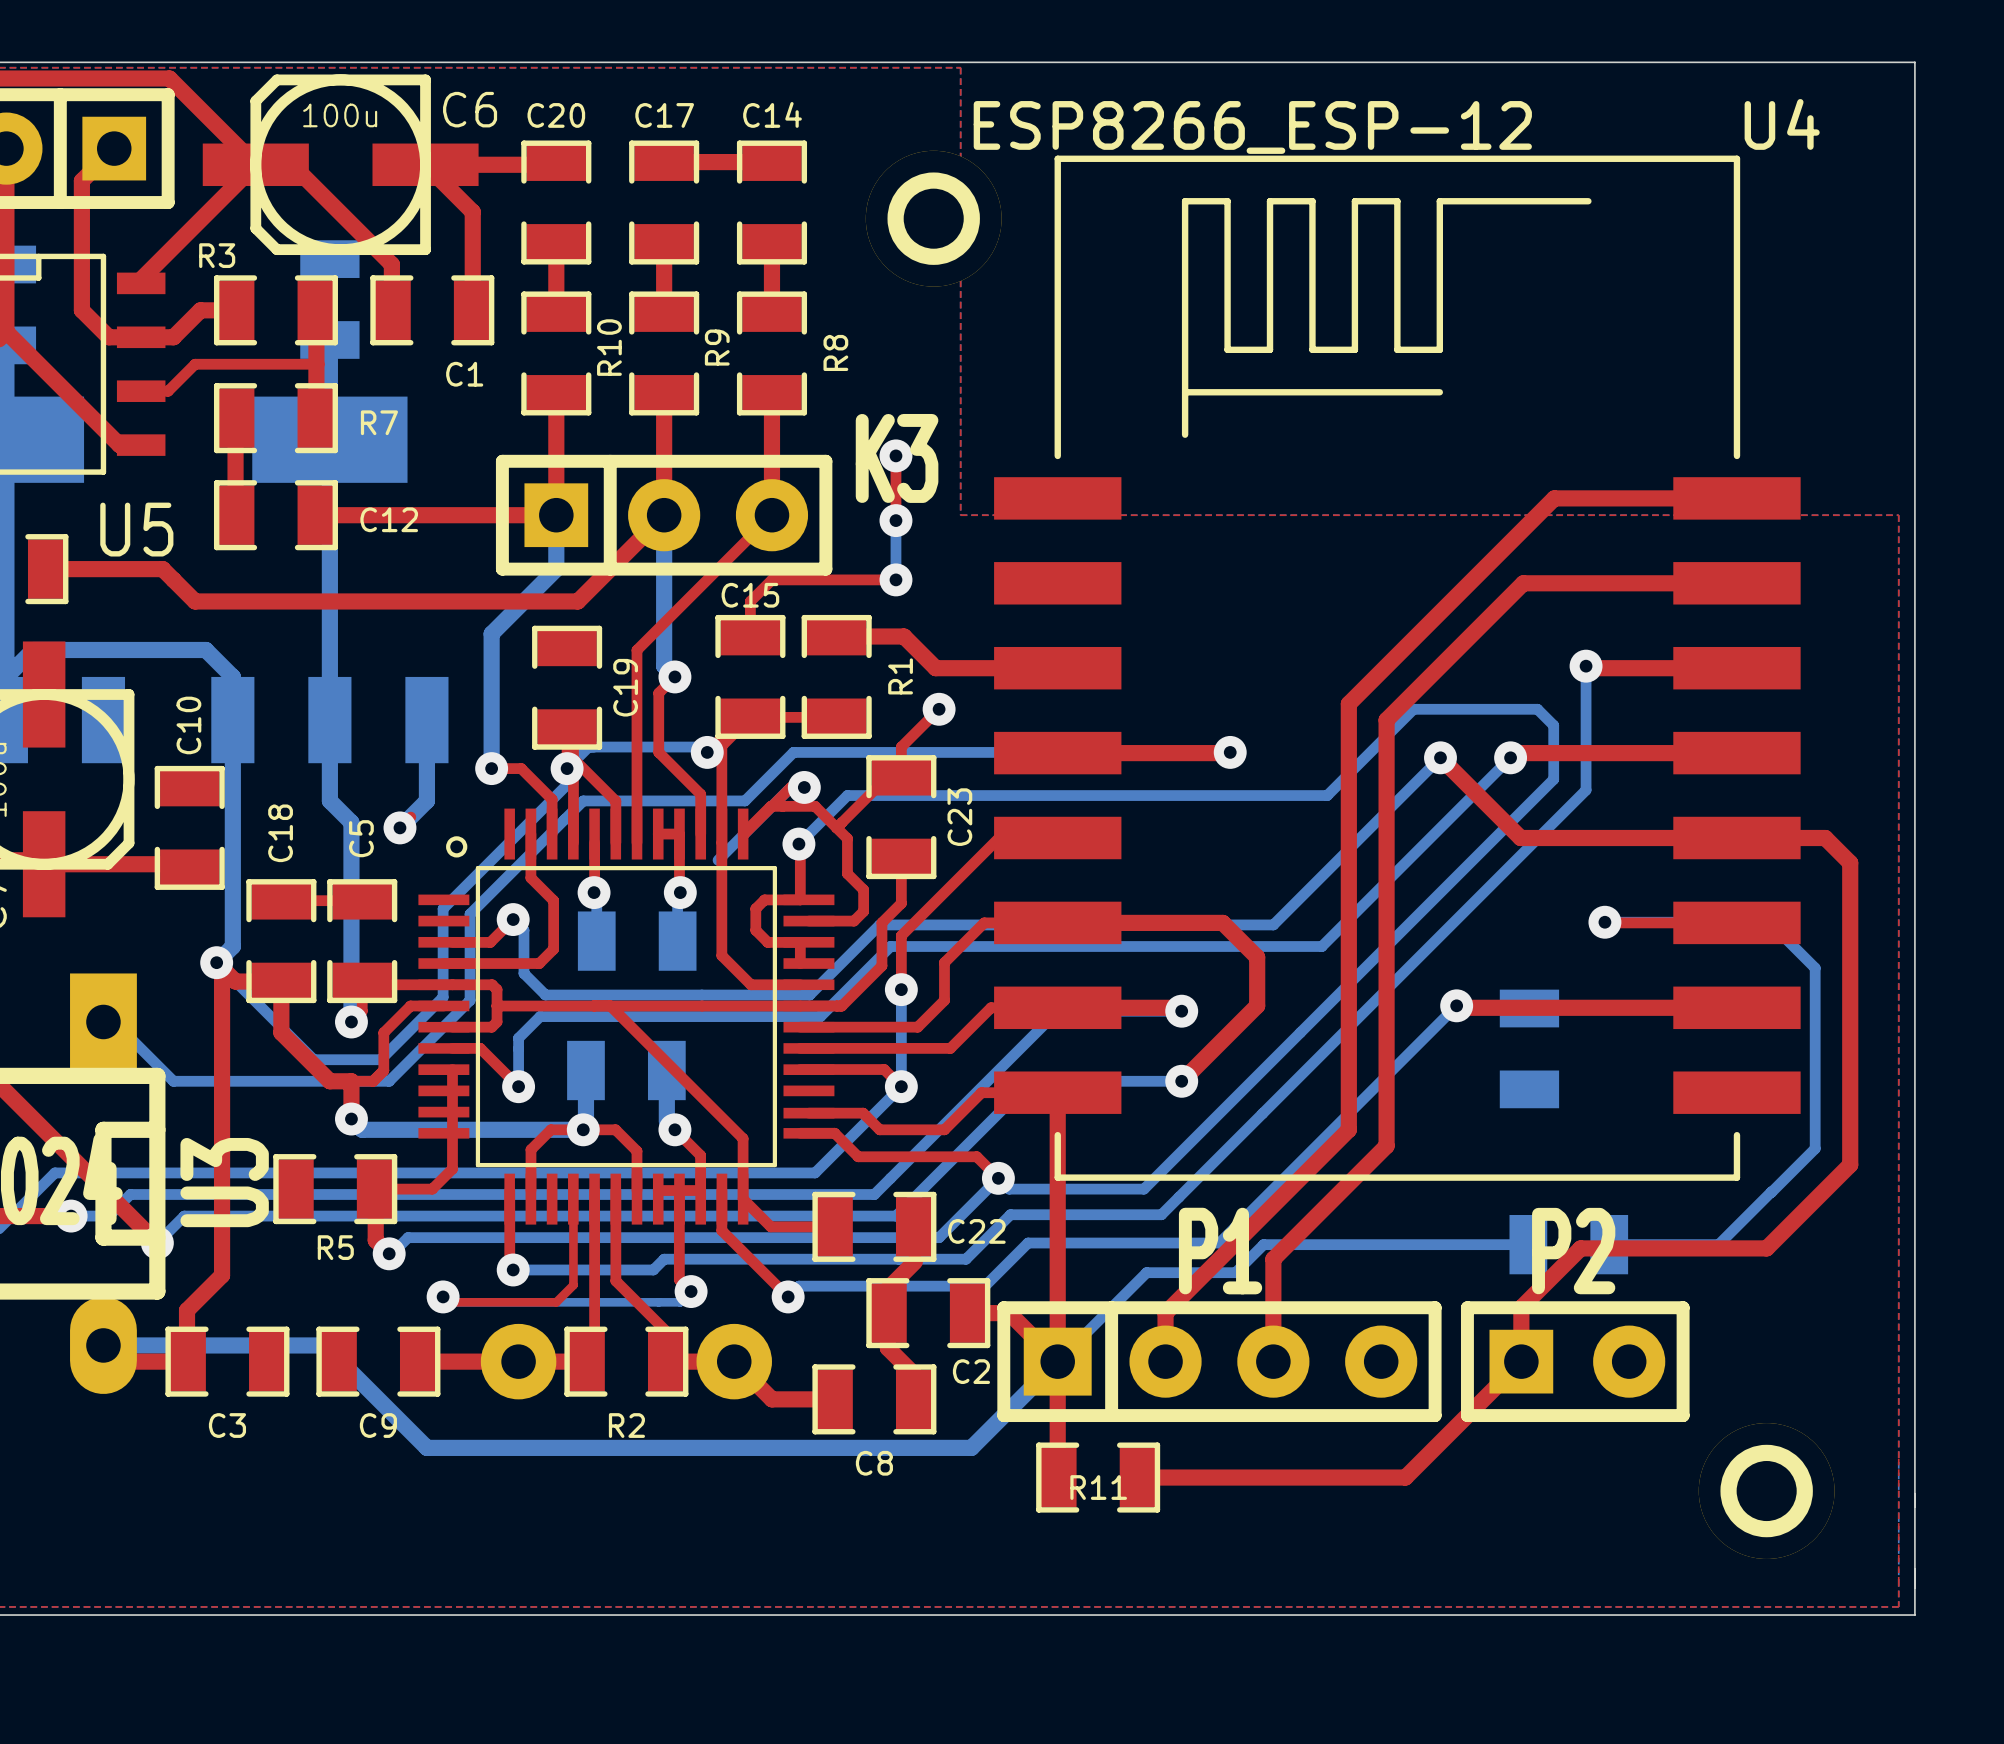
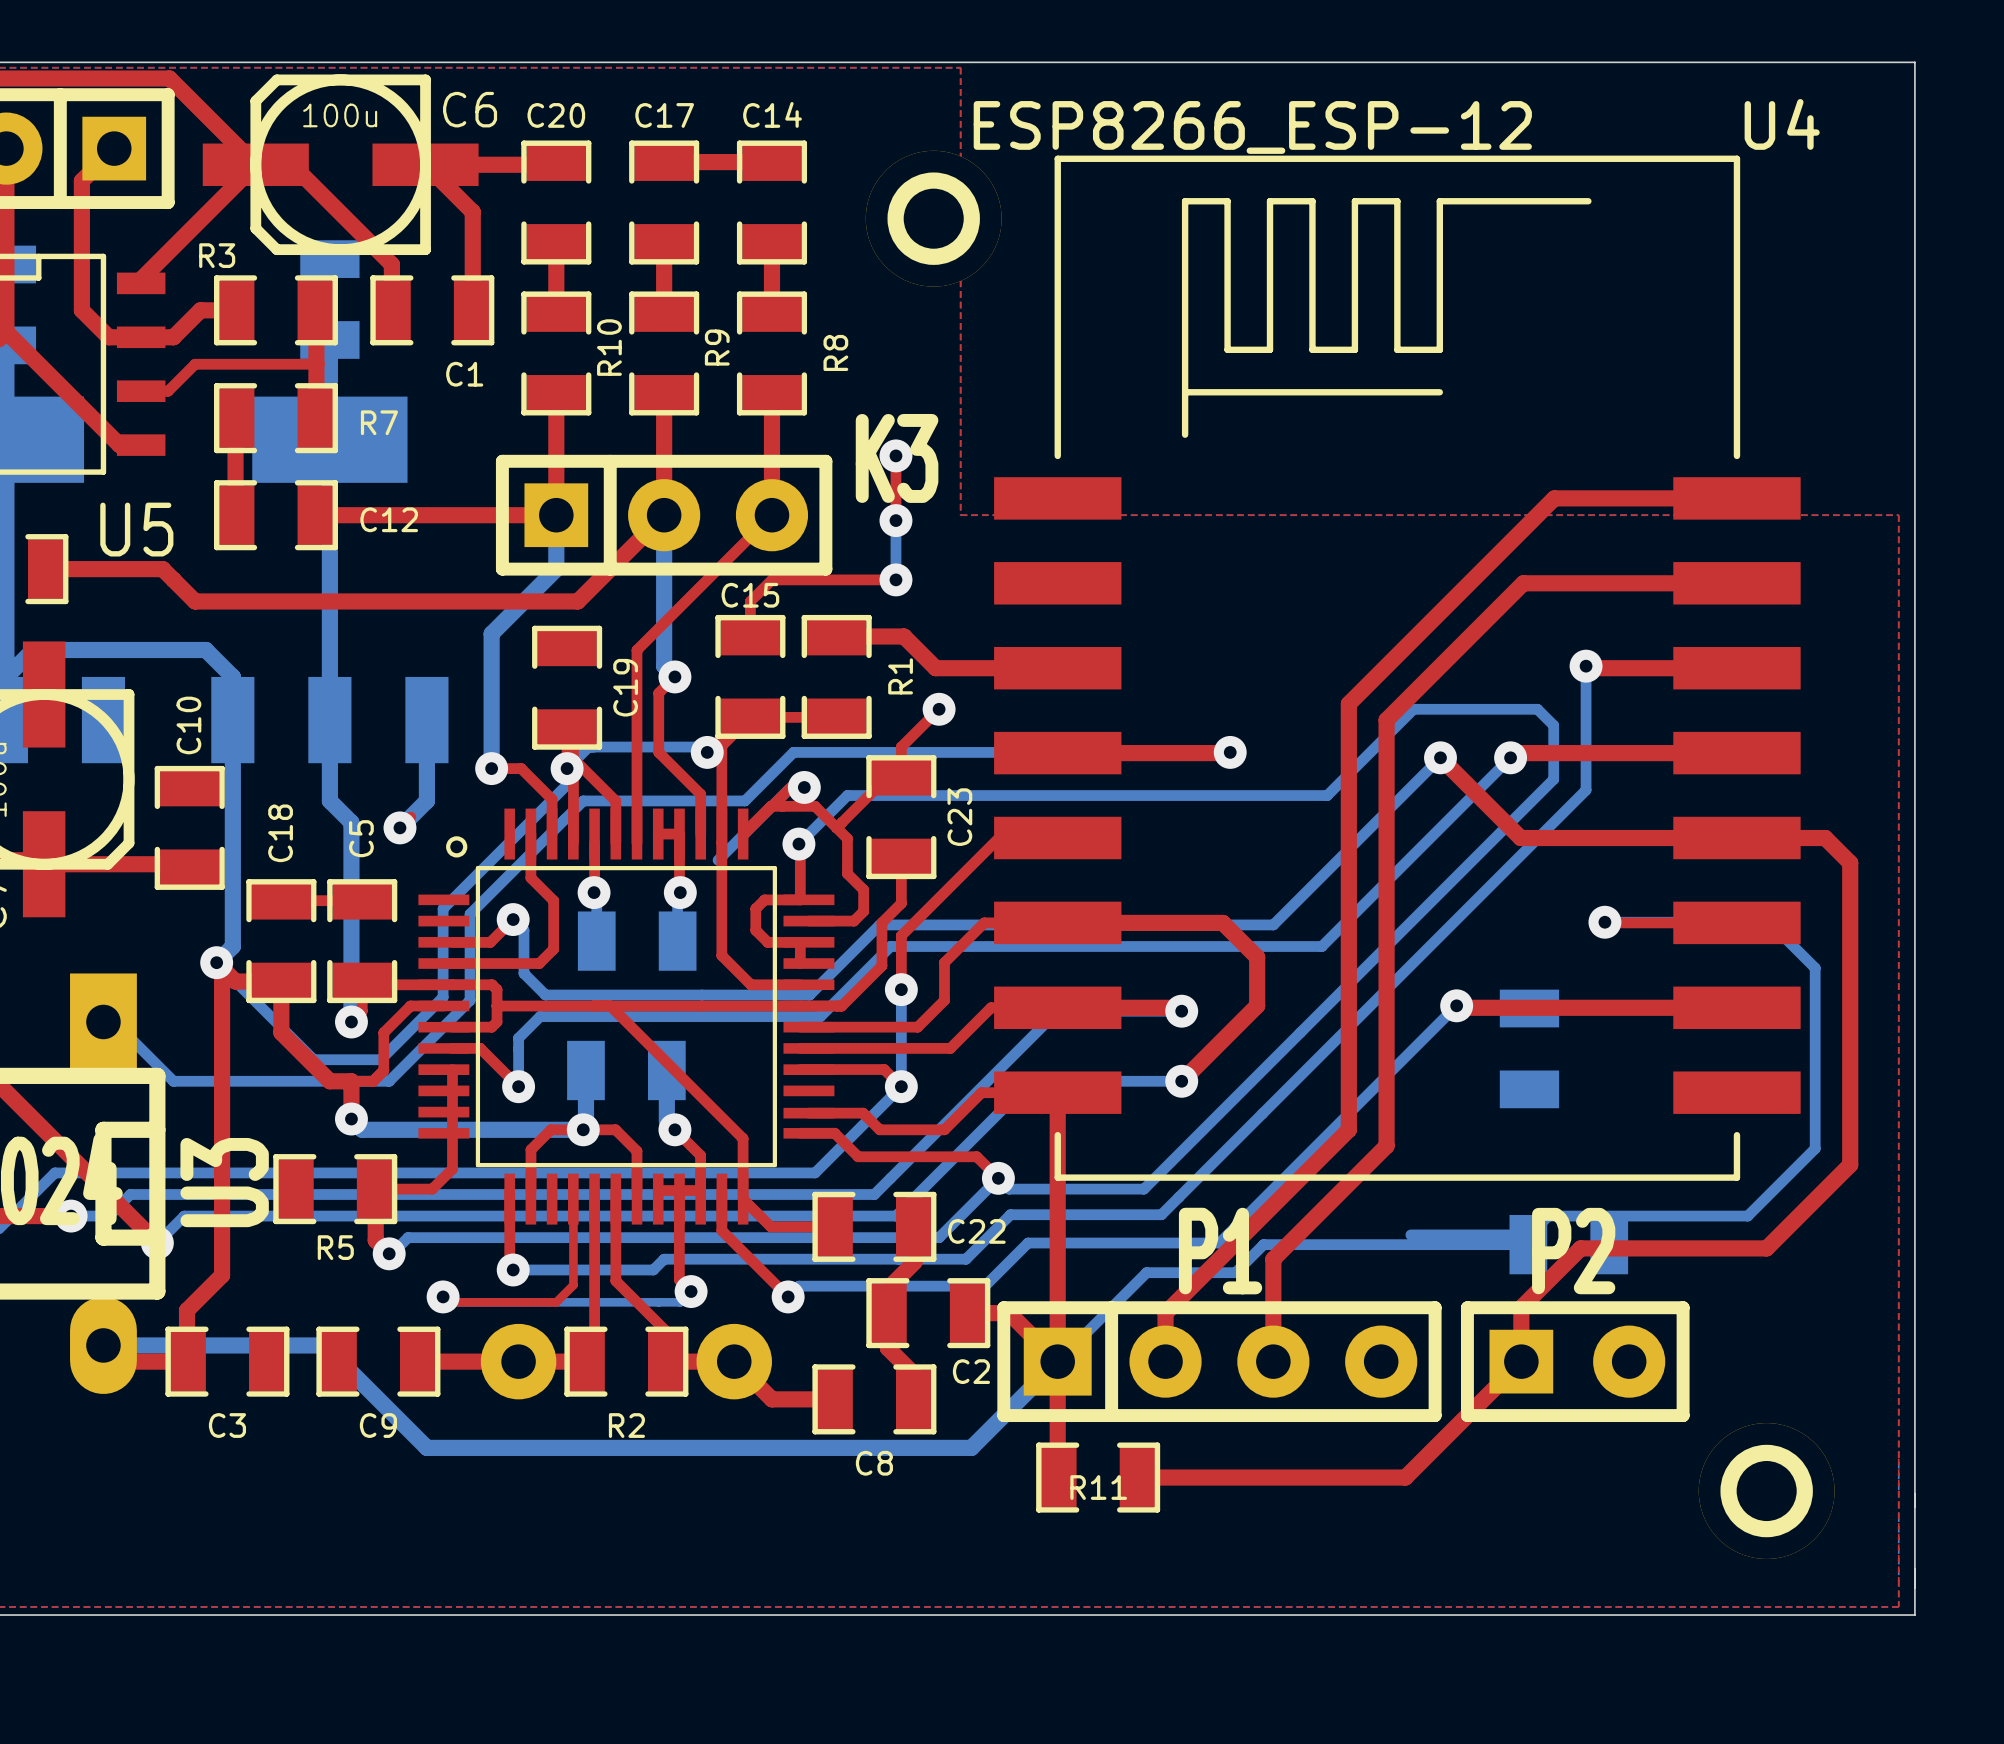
bottom track: (1771, 1191) (1718, 1244) (1609, 1244) -> (1771, 1192) (1747, 1216) (1548, 1216) (1529, 1234) (1410, 1234)

